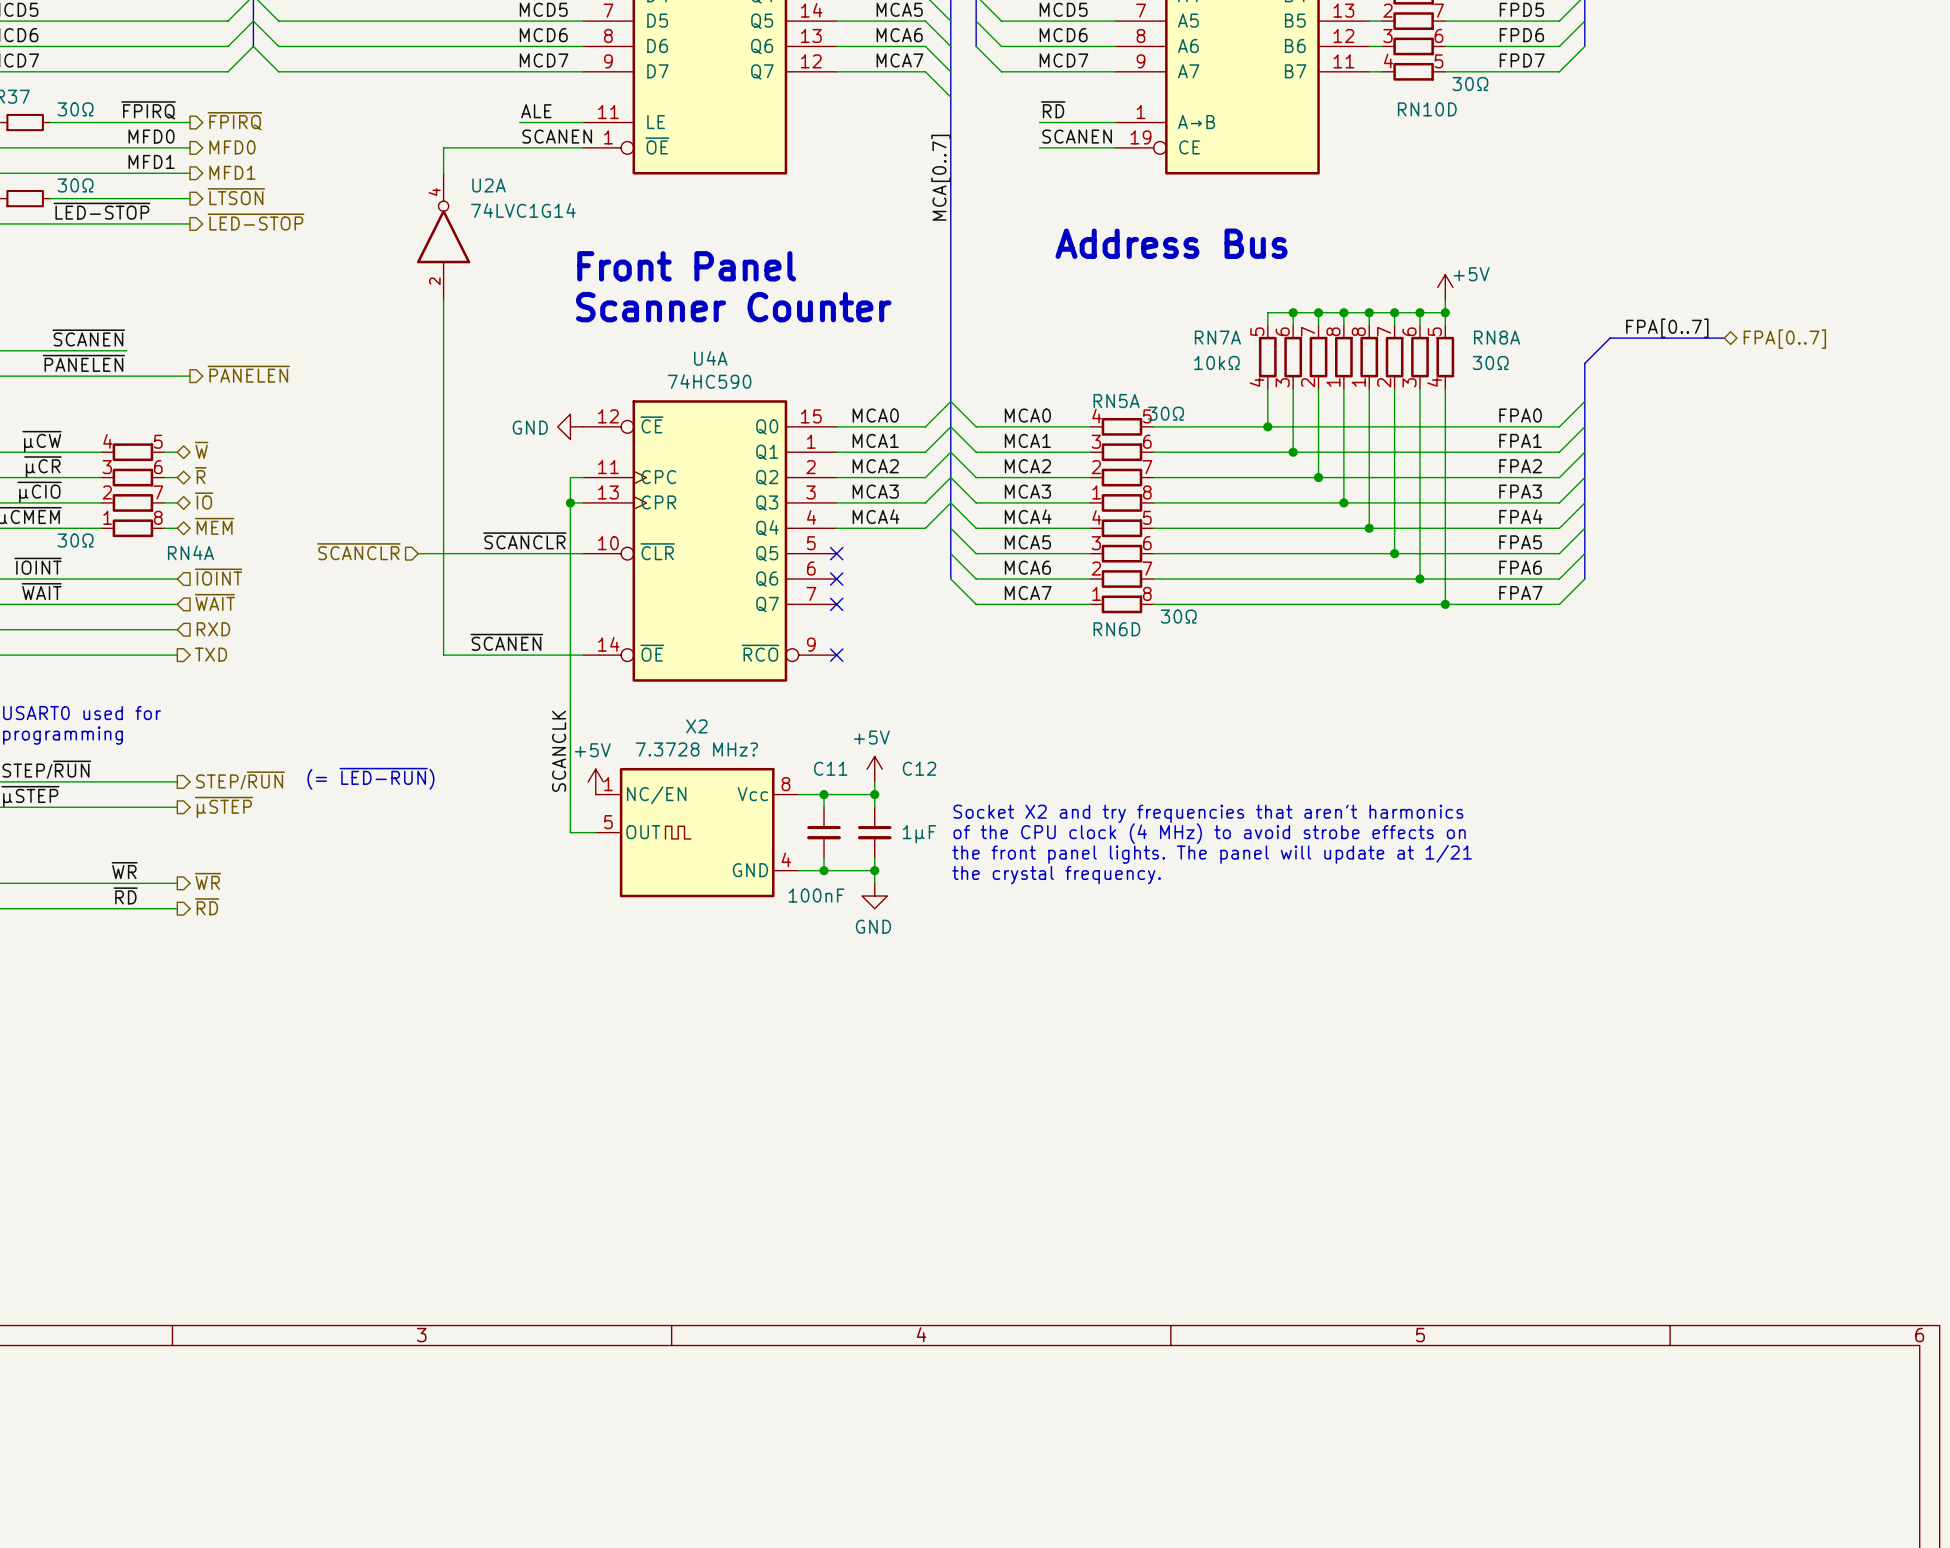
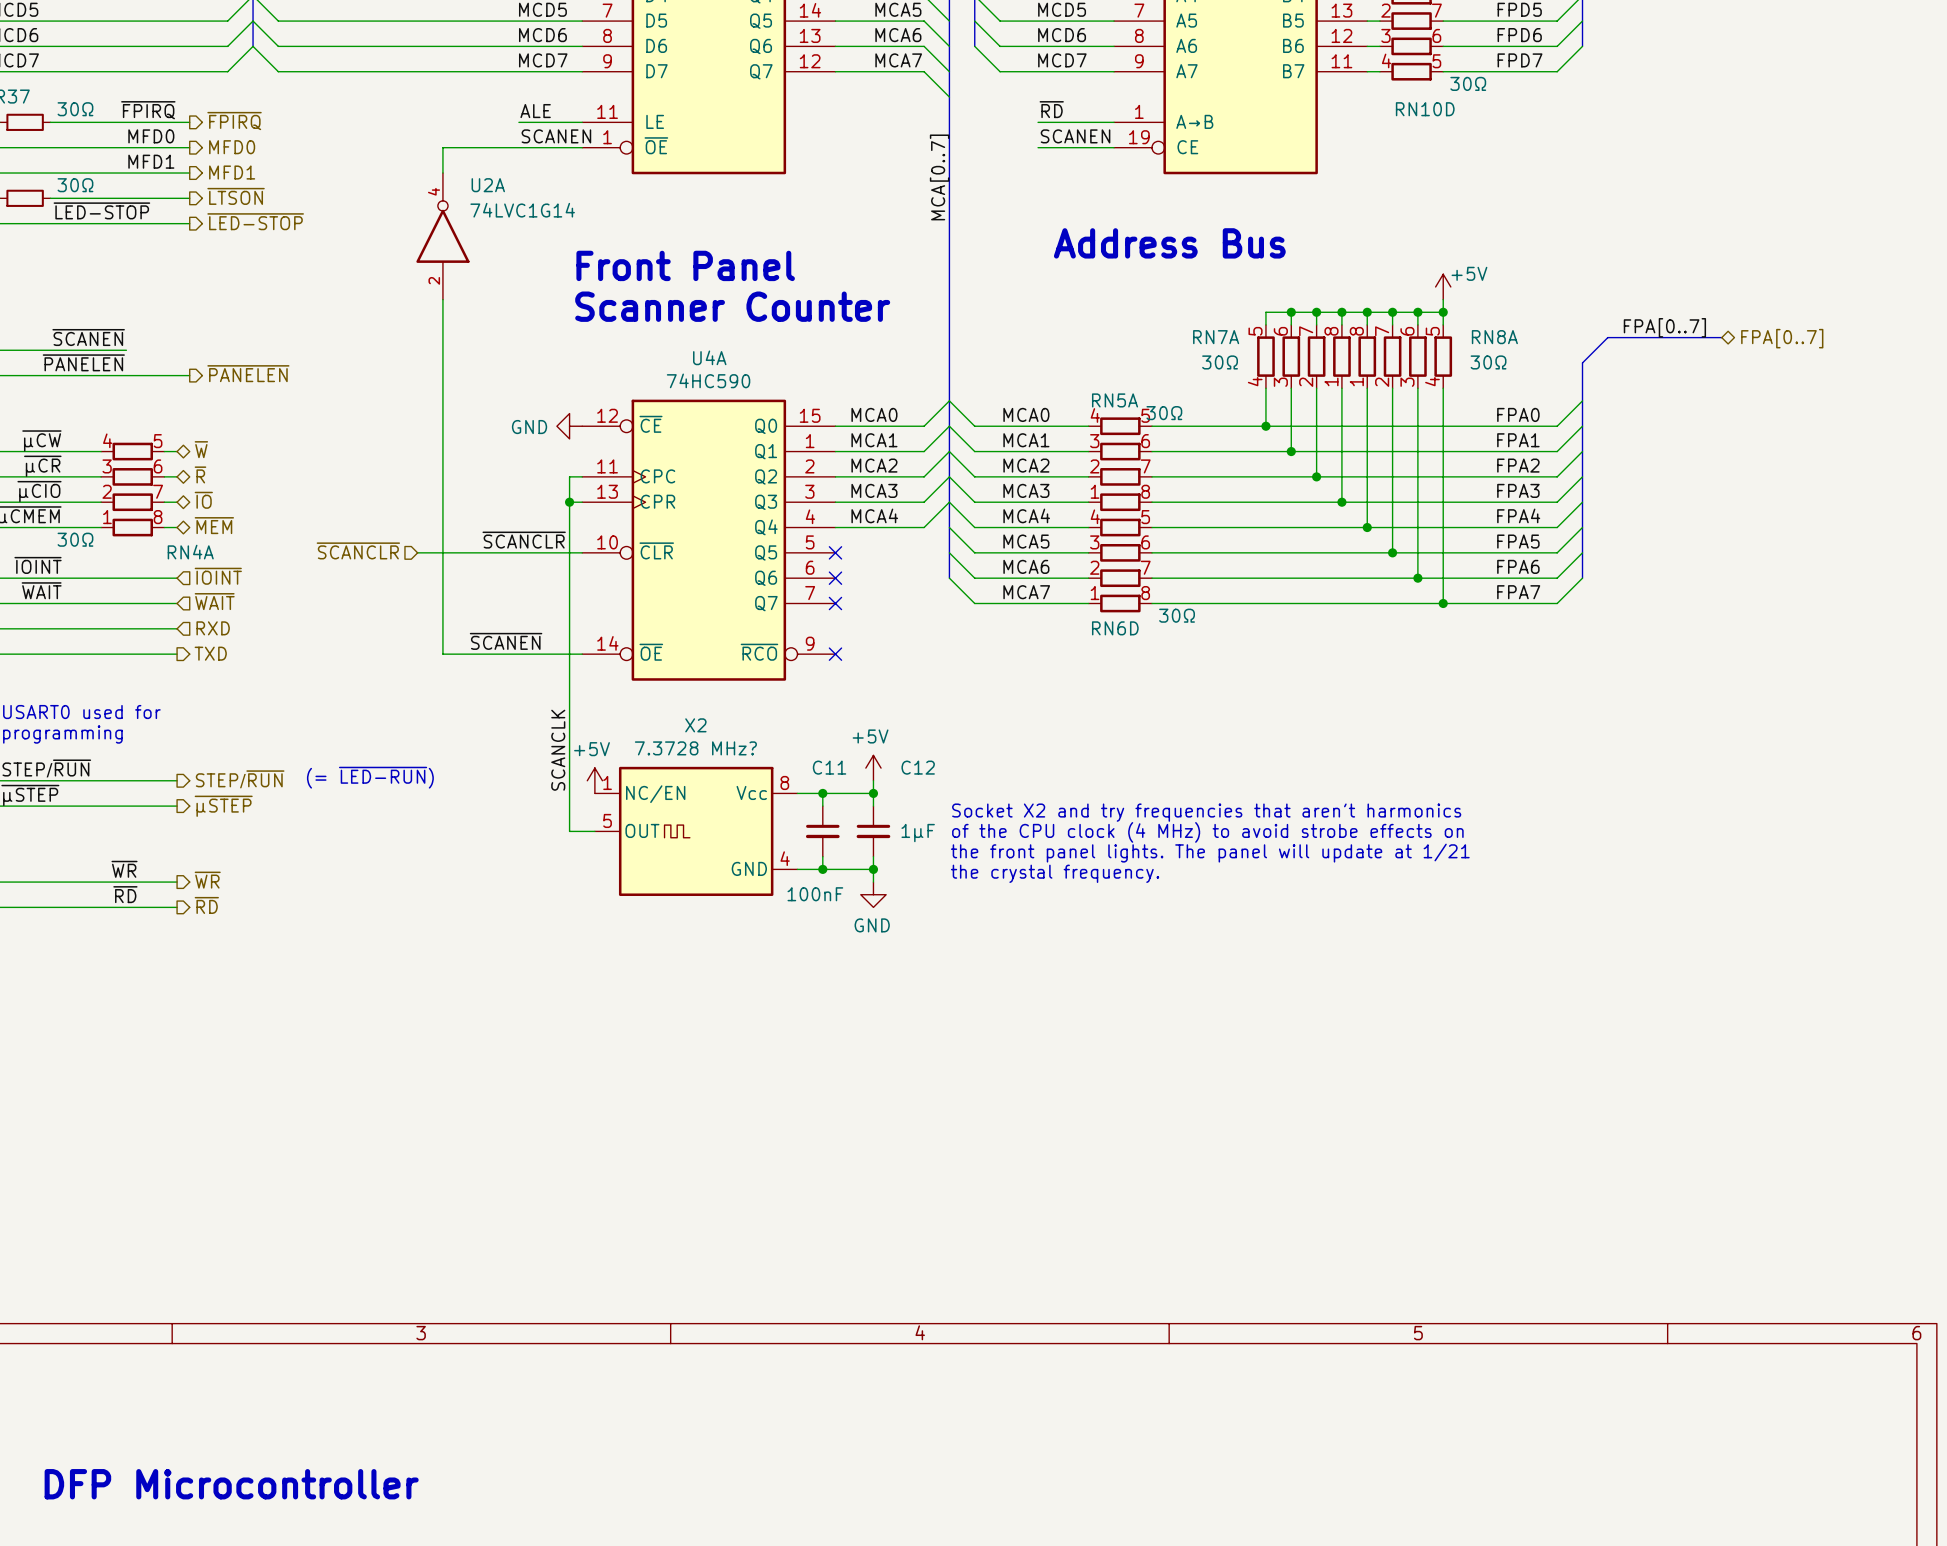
RN7A value: 10kΩ (1216, 362) -> 30Ω (1220, 362)
text: none -> DFP Microcontroller (231, 1484)

